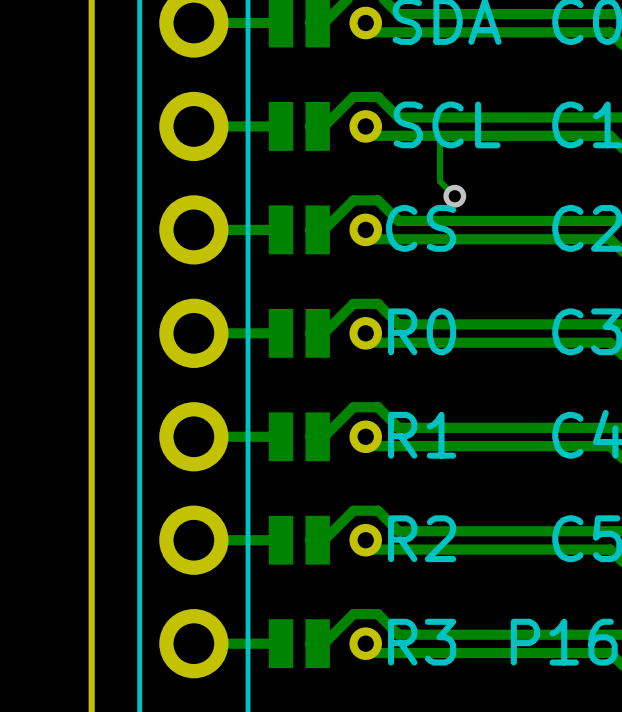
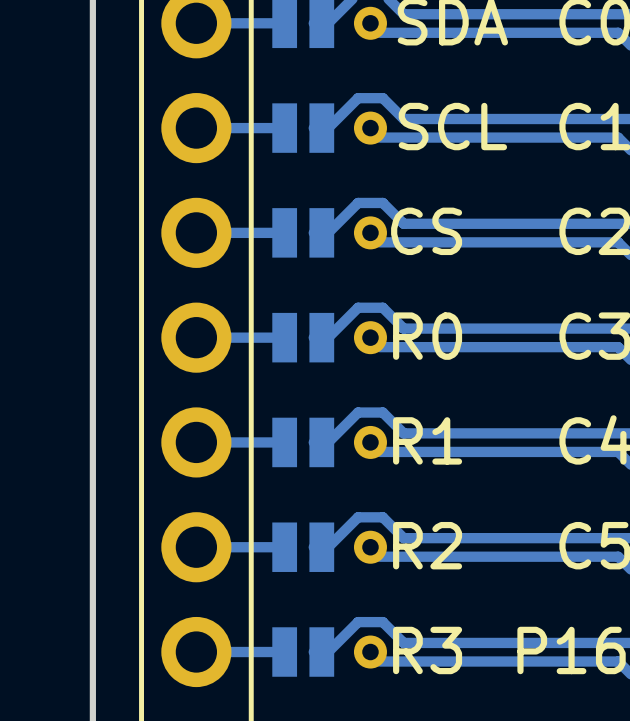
track: (440, 135) (440, 181) (454, 196) -> none
via: (454, 196) -> none

